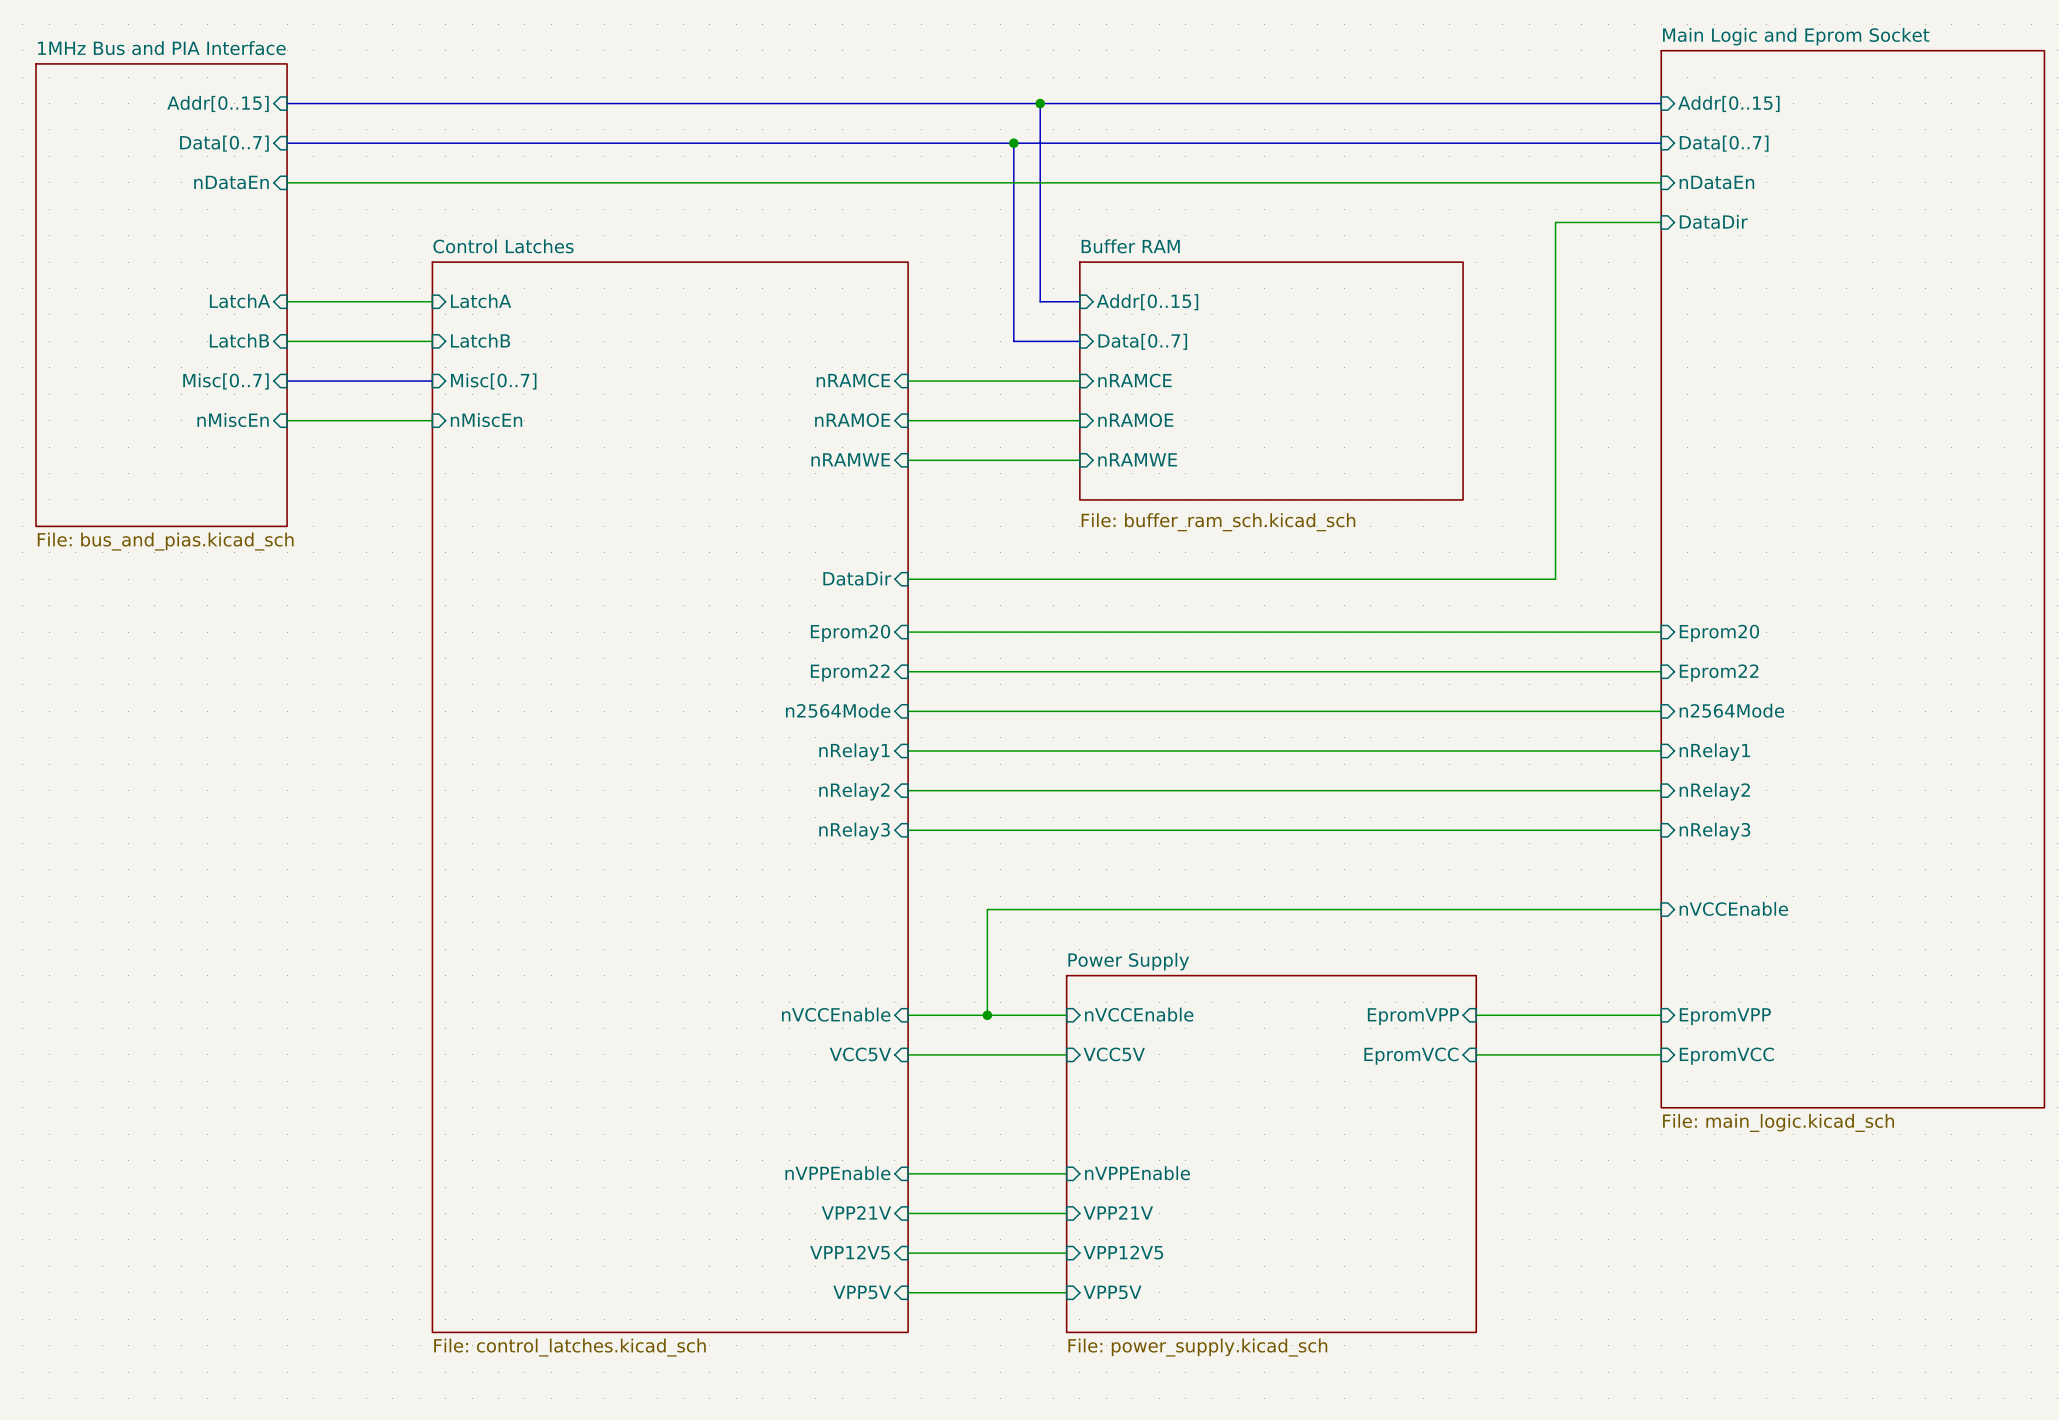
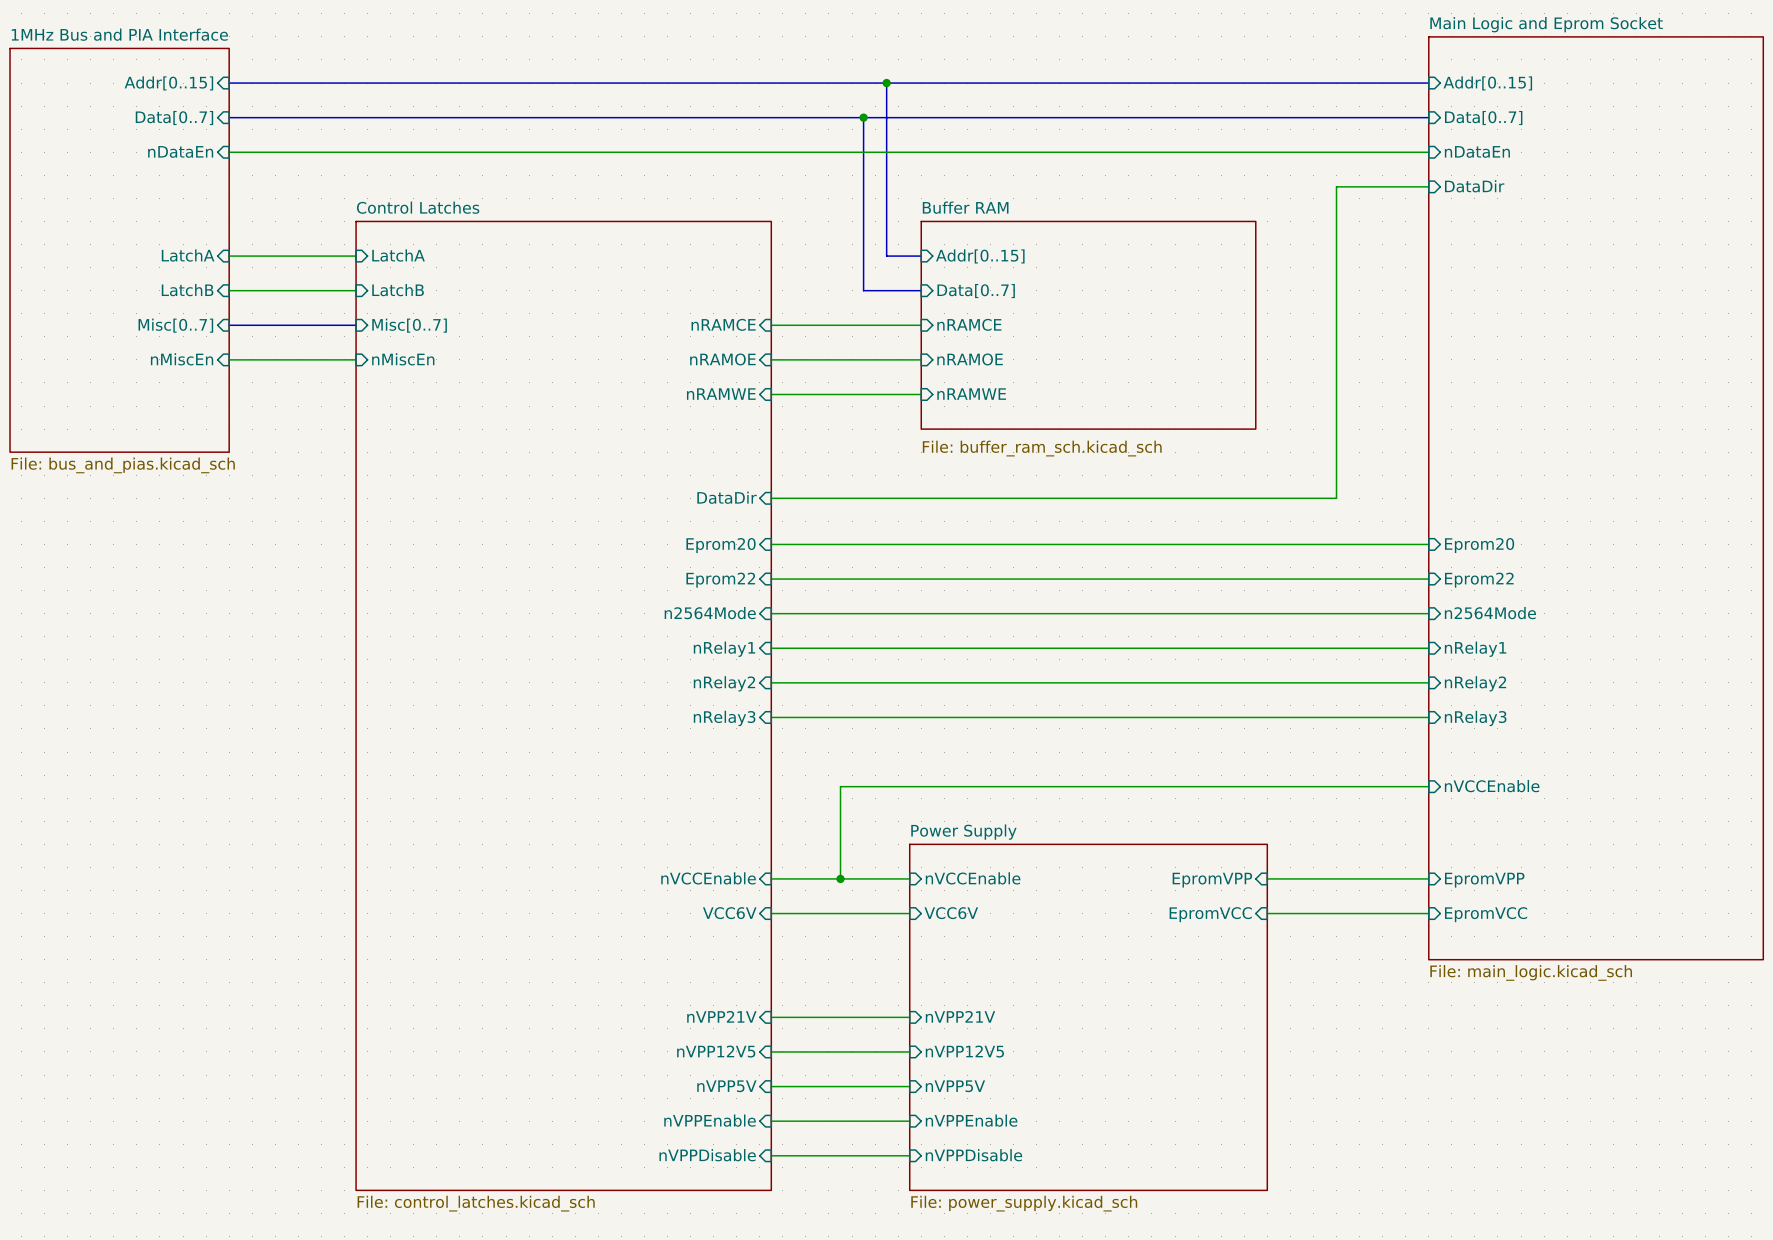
sheet Control Latches: File: control_latches.kicad_sch (670, 797) -> none
sheet Control Latches: none -> File: control_latches.kicad_sch (563, 705)
sheet pin: VCC5V (860, 1054) -> VCC6V (729, 913)
sheet pin: VCC5V (1114, 1054) -> VCC6V (951, 913)
sheet Power Supply: File: power_supply.kicad_sch (1271, 1154) -> none
sheet pin: nVPPEnable (837, 1173) -> nVPP21V (721, 1016)
sheet pin: nVPPEnable (1137, 1173) -> nVPP21V (960, 1016)
sheet Power Supply: none -> File: power_supply.kicad_sch (1088, 1017)
sheet pin: VPP21V (856, 1212) -> nVPP12V5 (716, 1051)
sheet pin: VPP21V (1118, 1212) -> nVPP12V5 (964, 1051)
sheet pin: VPP12V5 (849, 1252) -> nVPP5V (726, 1086)
sheet pin: VPP12V5 (1123, 1252) -> nVPP5V (955, 1086)
sheet pin: VPP5V (862, 1292) -> nVPPEnable (710, 1120)
sheet pin: VPP5V (1112, 1292) -> nVPPEnable (971, 1120)
sheet pin: none -> nVPPDisable (707, 1155)
sheet pin: none -> nVPPDisable (973, 1155)
wire: none -> (771, 1155) (909, 1155)

